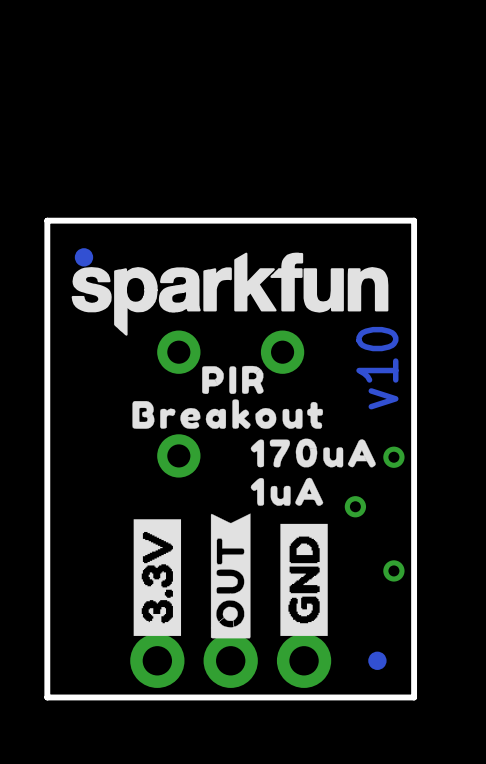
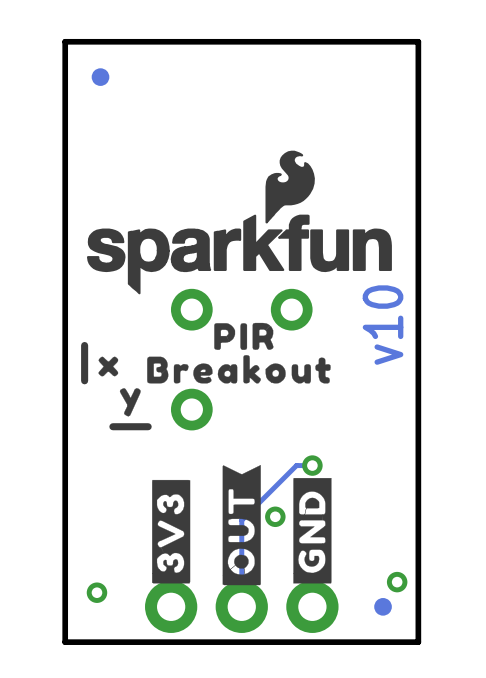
drawing: none -> [86, 150, 392, 295]
board edge: (414, 220) (47, 220) -> (418, 183) (418, 41) (65, 41) (65, 183)
drawing: [71, 252, 389, 336] -> none
part position: (83, 257) -> (100, 77)
line: none -> (84, 345) (84, 380)
drawing: none -> [98, 356, 141, 417]
drawing: [250, 438, 376, 506] -> none
via: (393, 457) -> none
line: none -> (148, 426) (112, 426)
via position: (355, 506) -> (312, 465)
track: none -> (312, 465) (296, 465) (241, 520) (241, 606)
drawing shape: [133, 519, 182, 636] -> [152, 479, 191, 584]
drawing shape: [280, 523, 328, 636] -> [293, 478, 332, 584]
via: none -> (275, 516)
via: (393, 570) -> none
via: none -> (397, 582)
via: none -> (96, 592)

